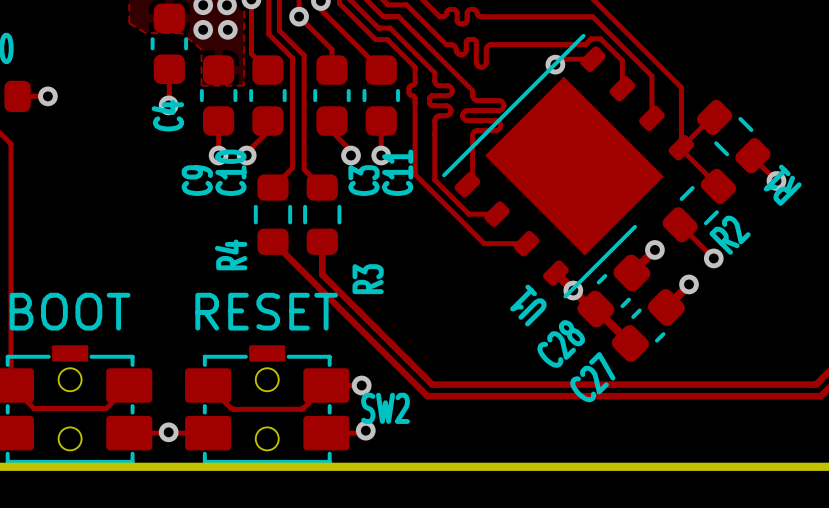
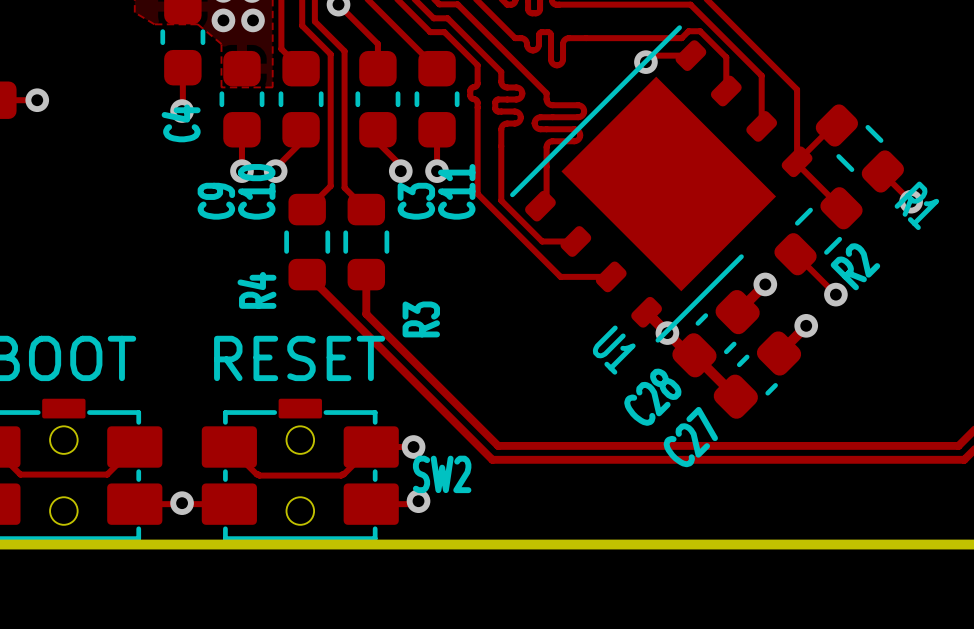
R1 name rotation: 0° (782, 185) -> 180° (916, 205)
U1 name rotation: 0° (528, 305) -> 180° (614, 350)

